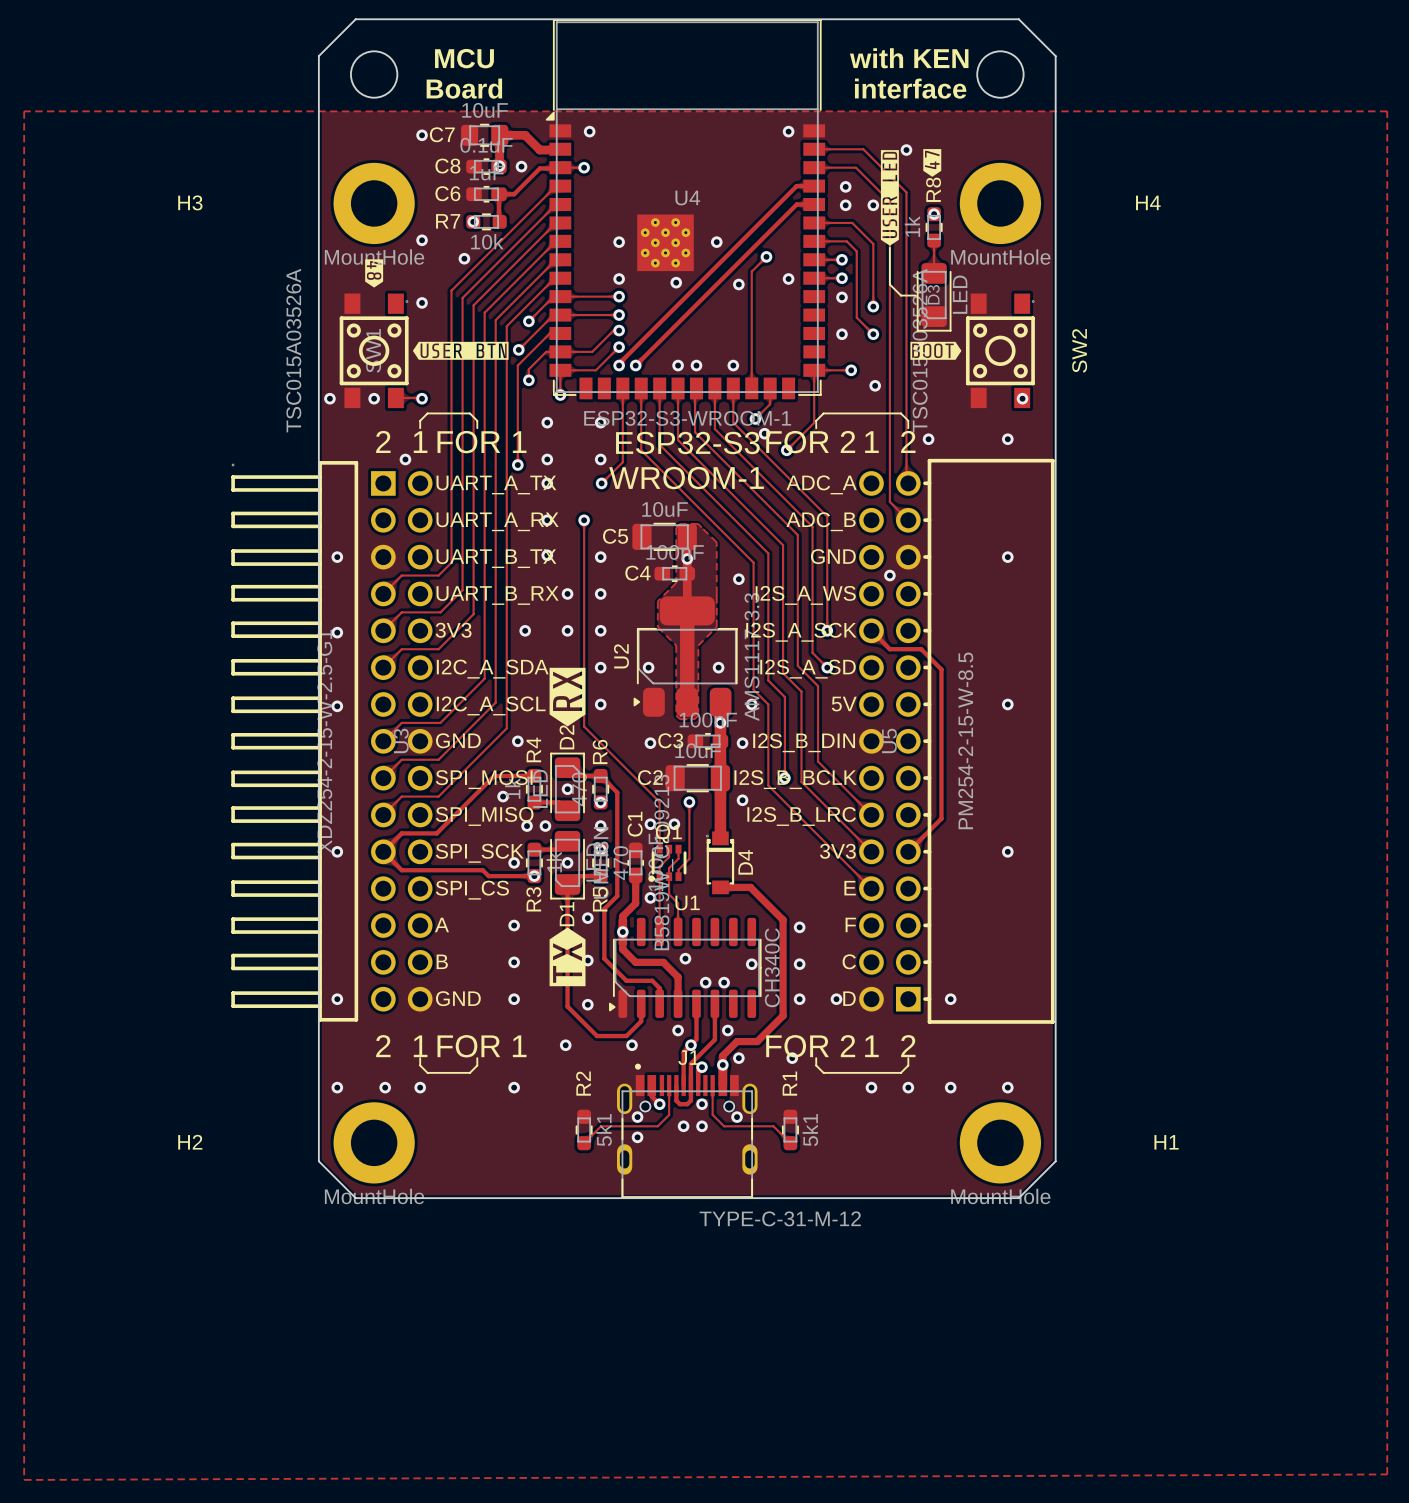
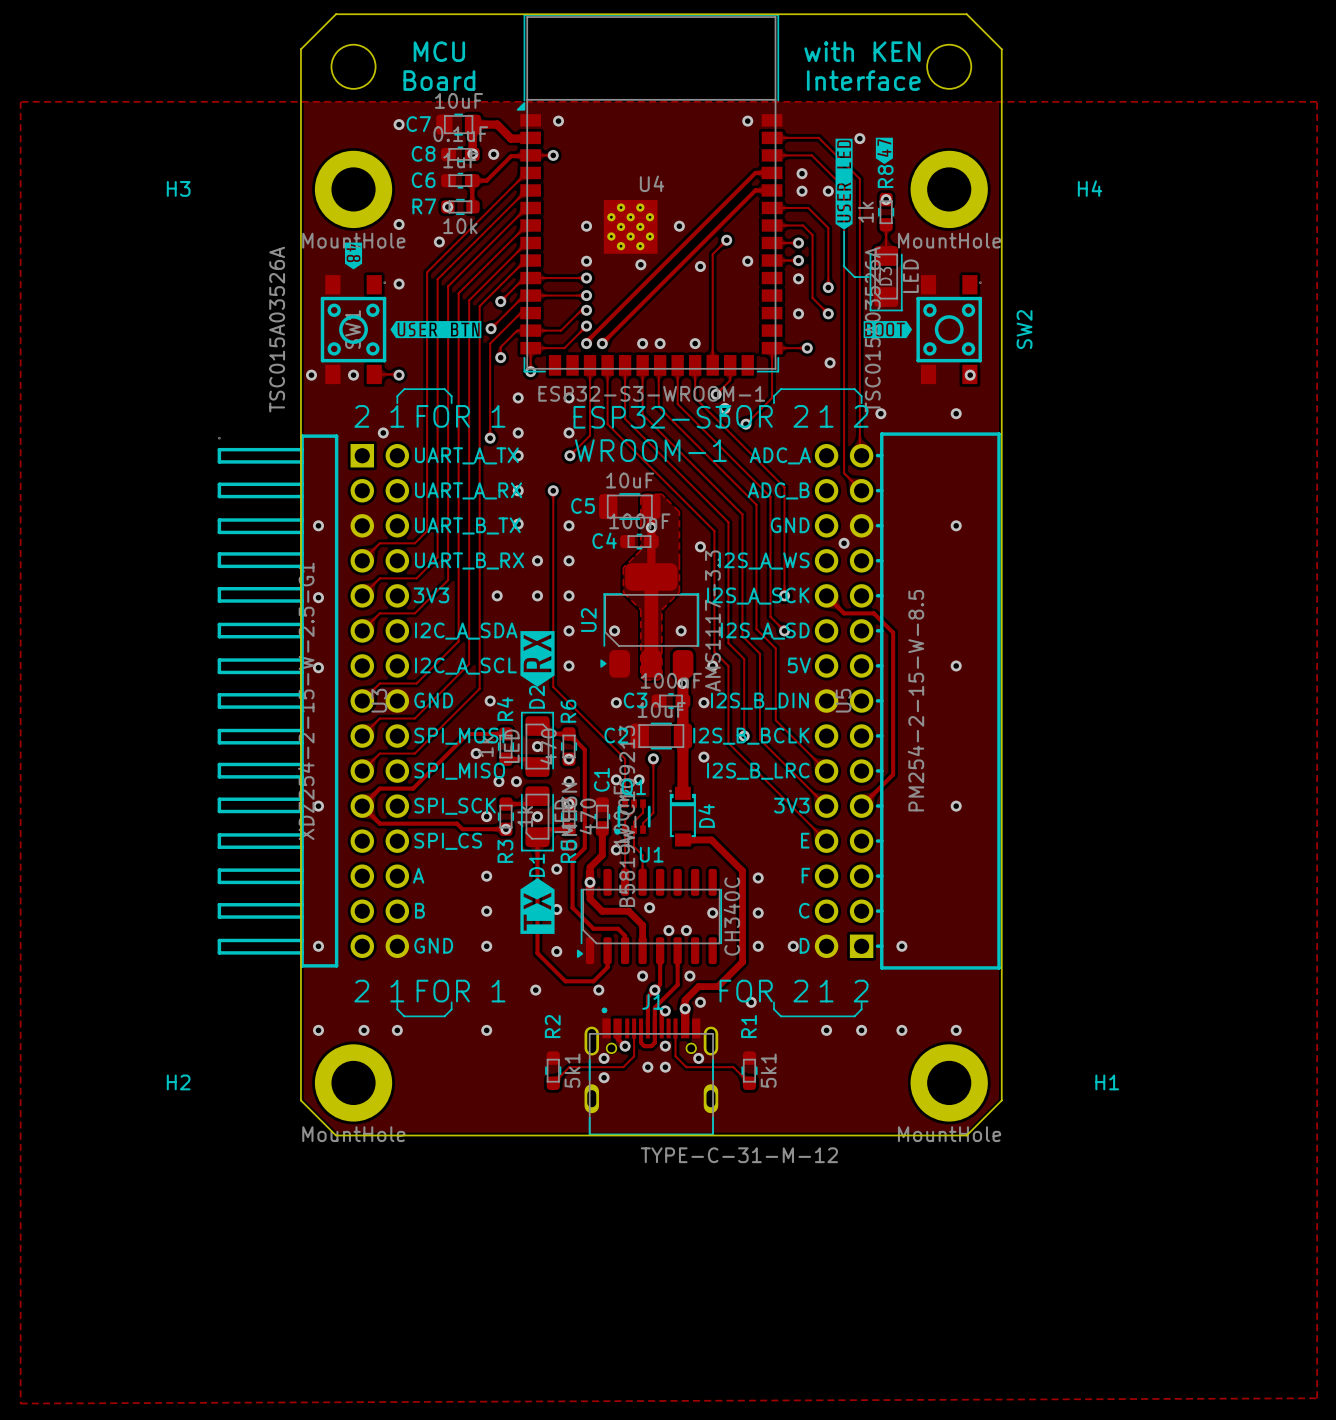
text: interface (910, 88) -> Interface (863, 80)

